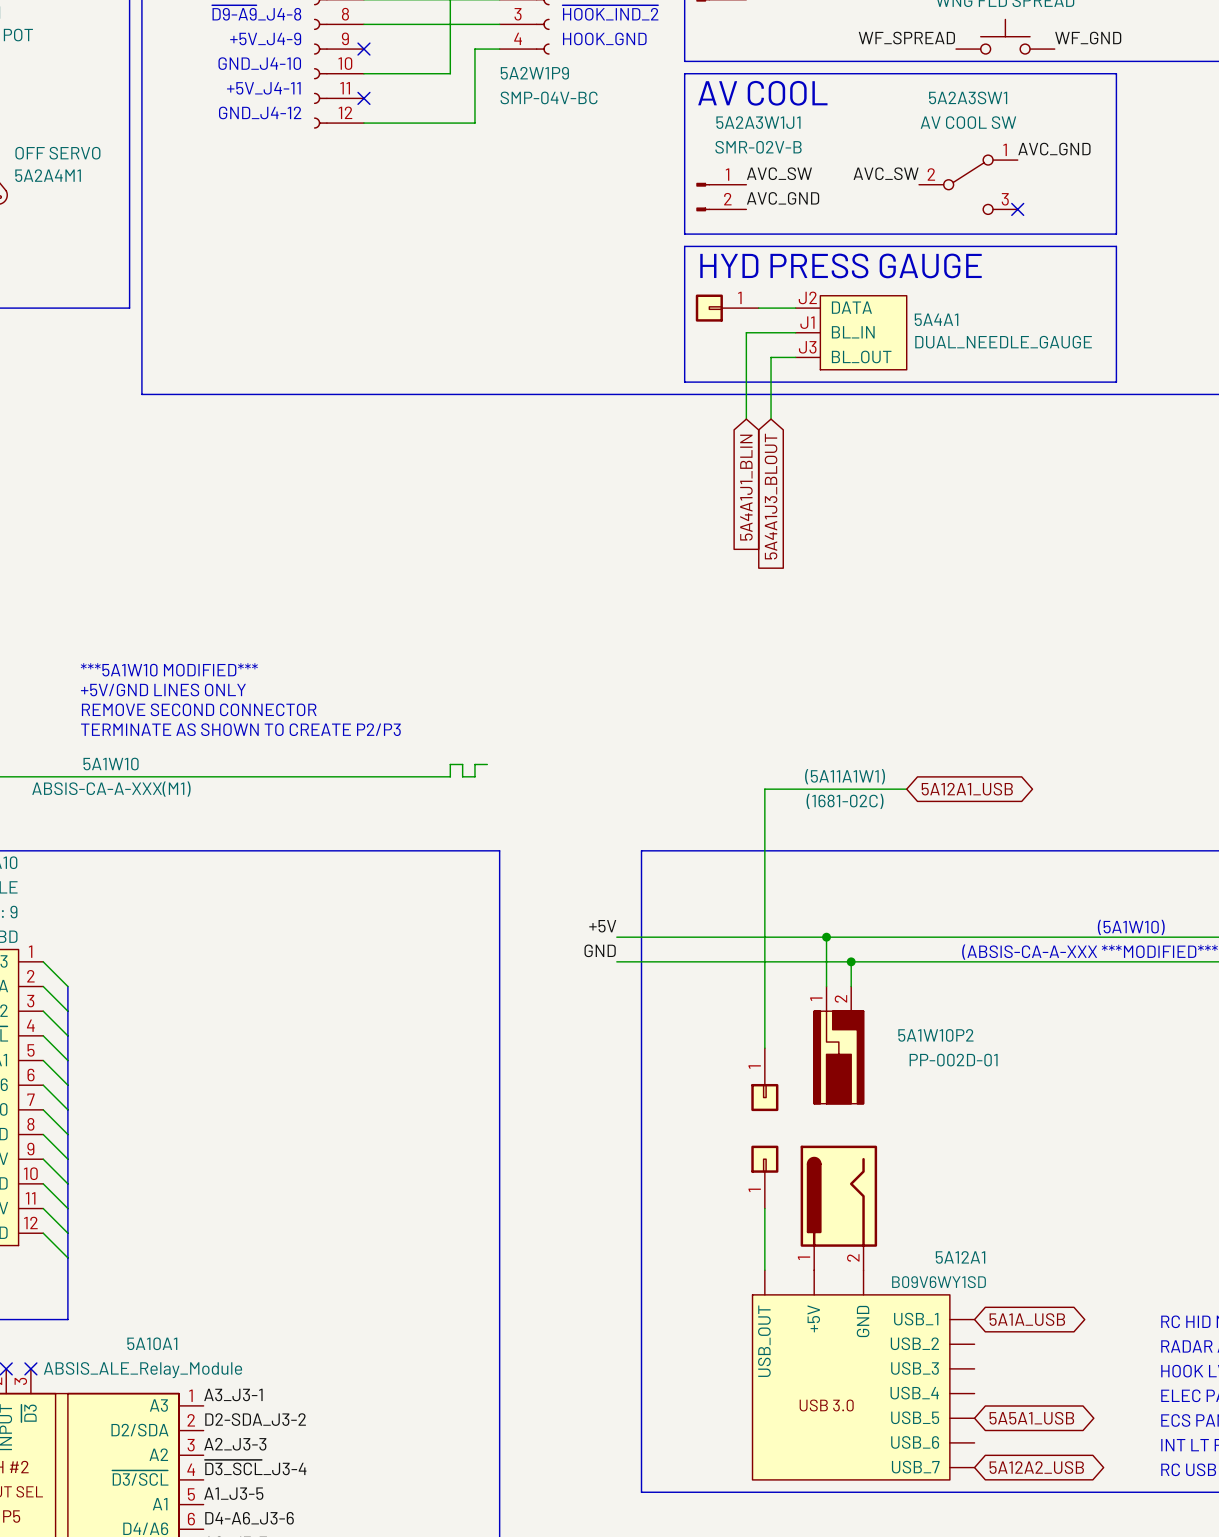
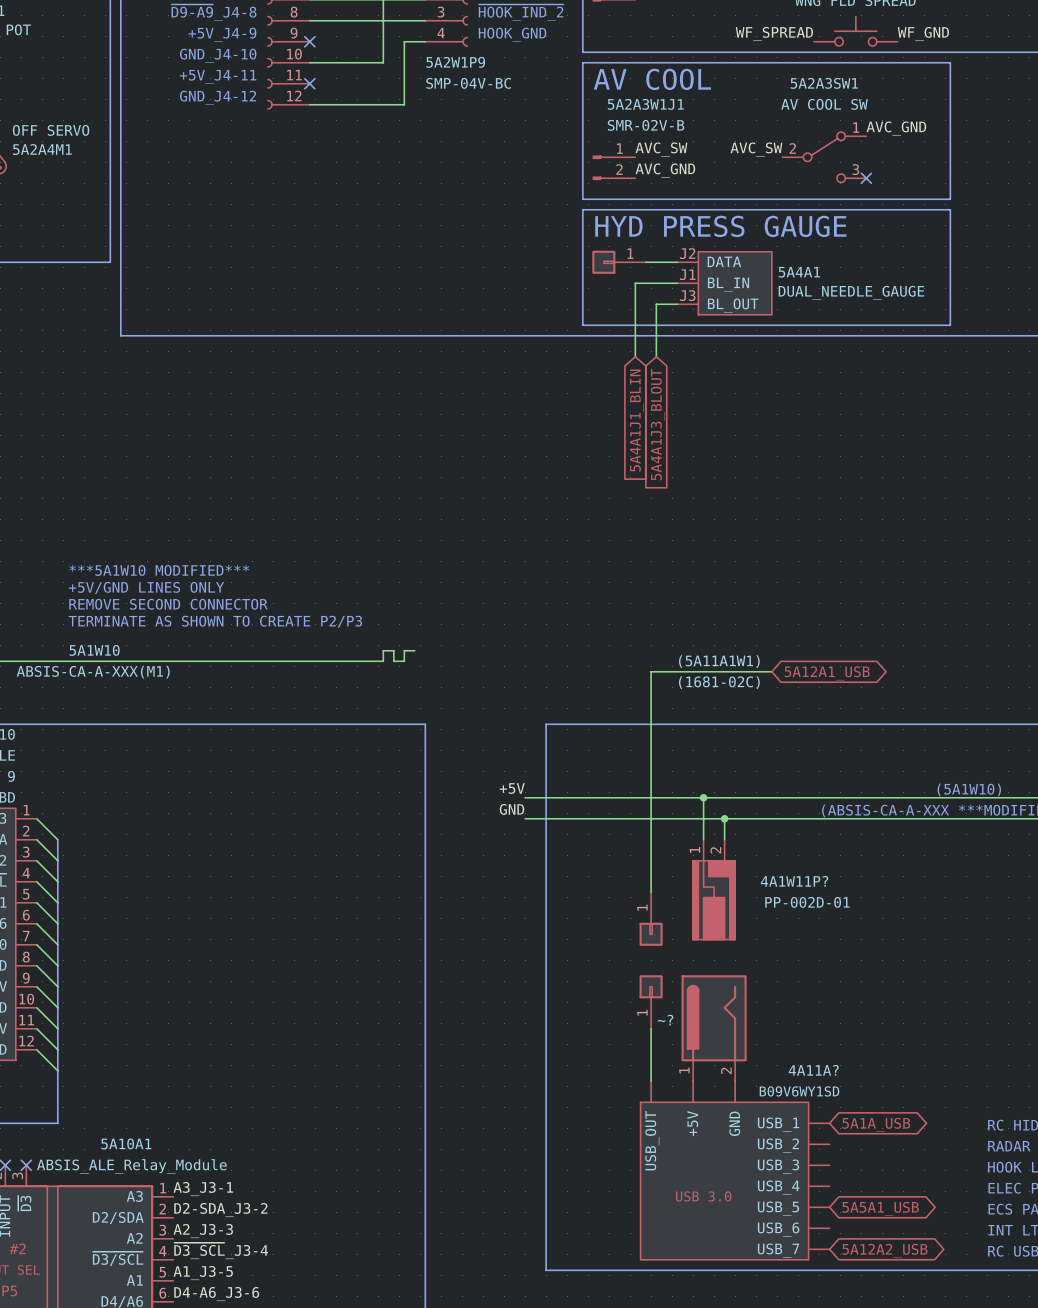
5A1W10P2 name: 5A1W10P2 (935, 1035) -> 4A1W11P? (794, 881)
part name: none -> ~? (665, 1020)
5A12A1 name: 5A12A1 (960, 1257) -> 4A11A? (813, 1070)

